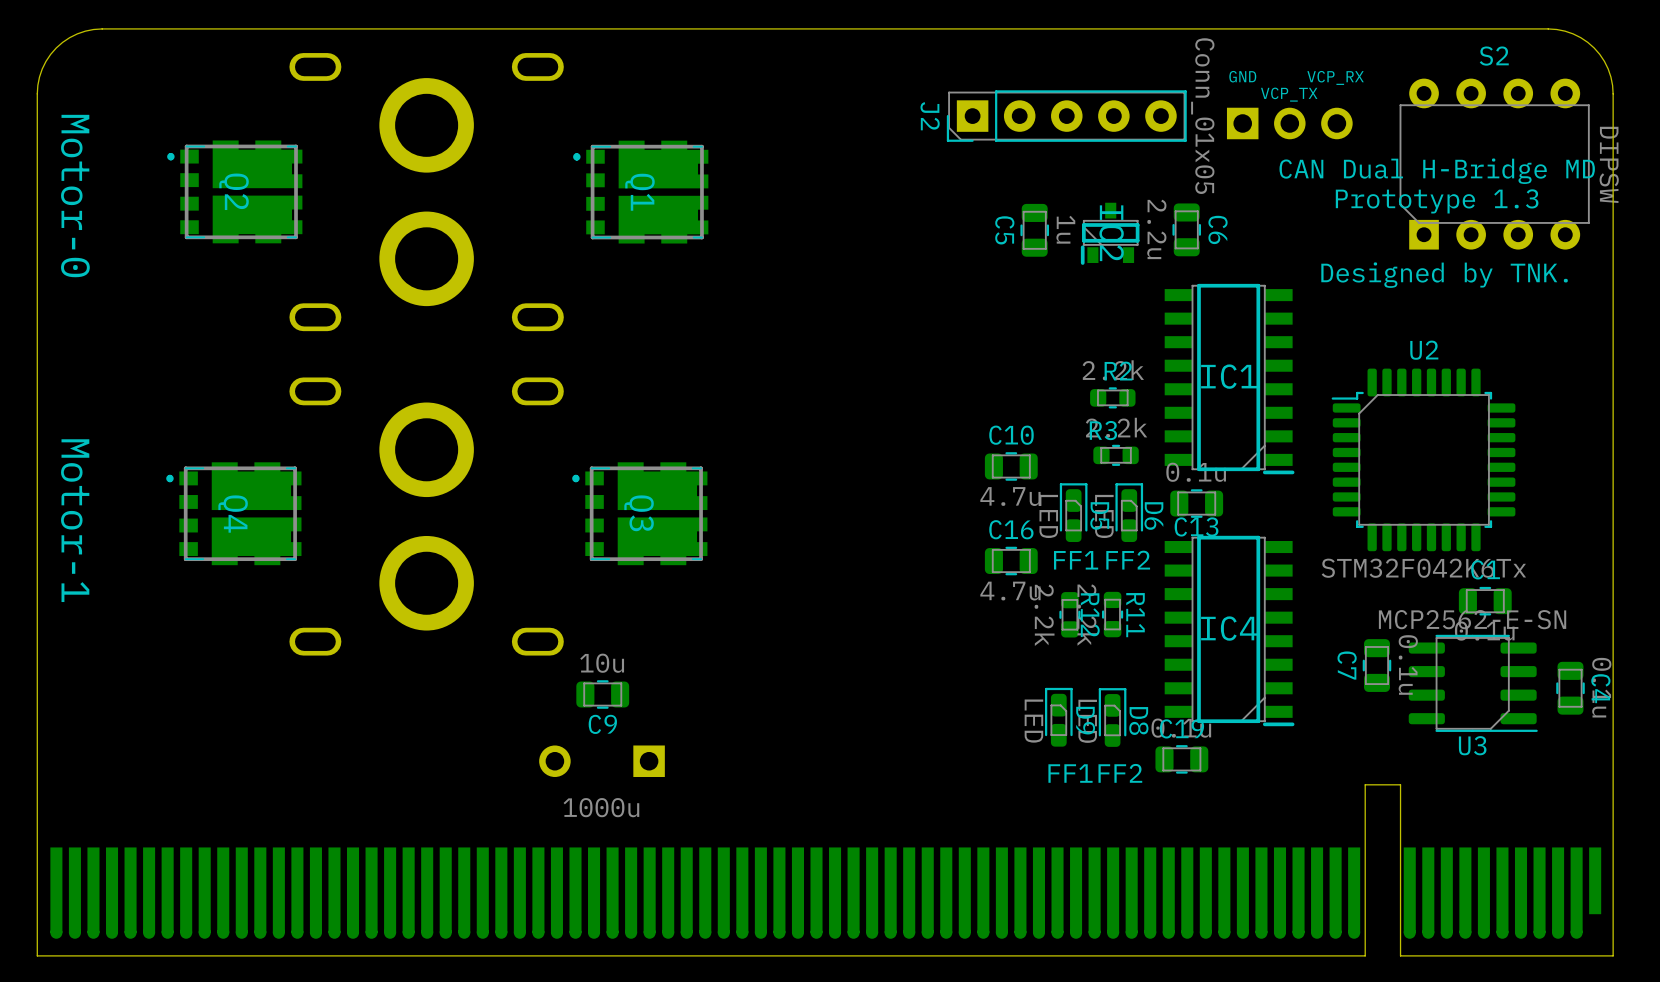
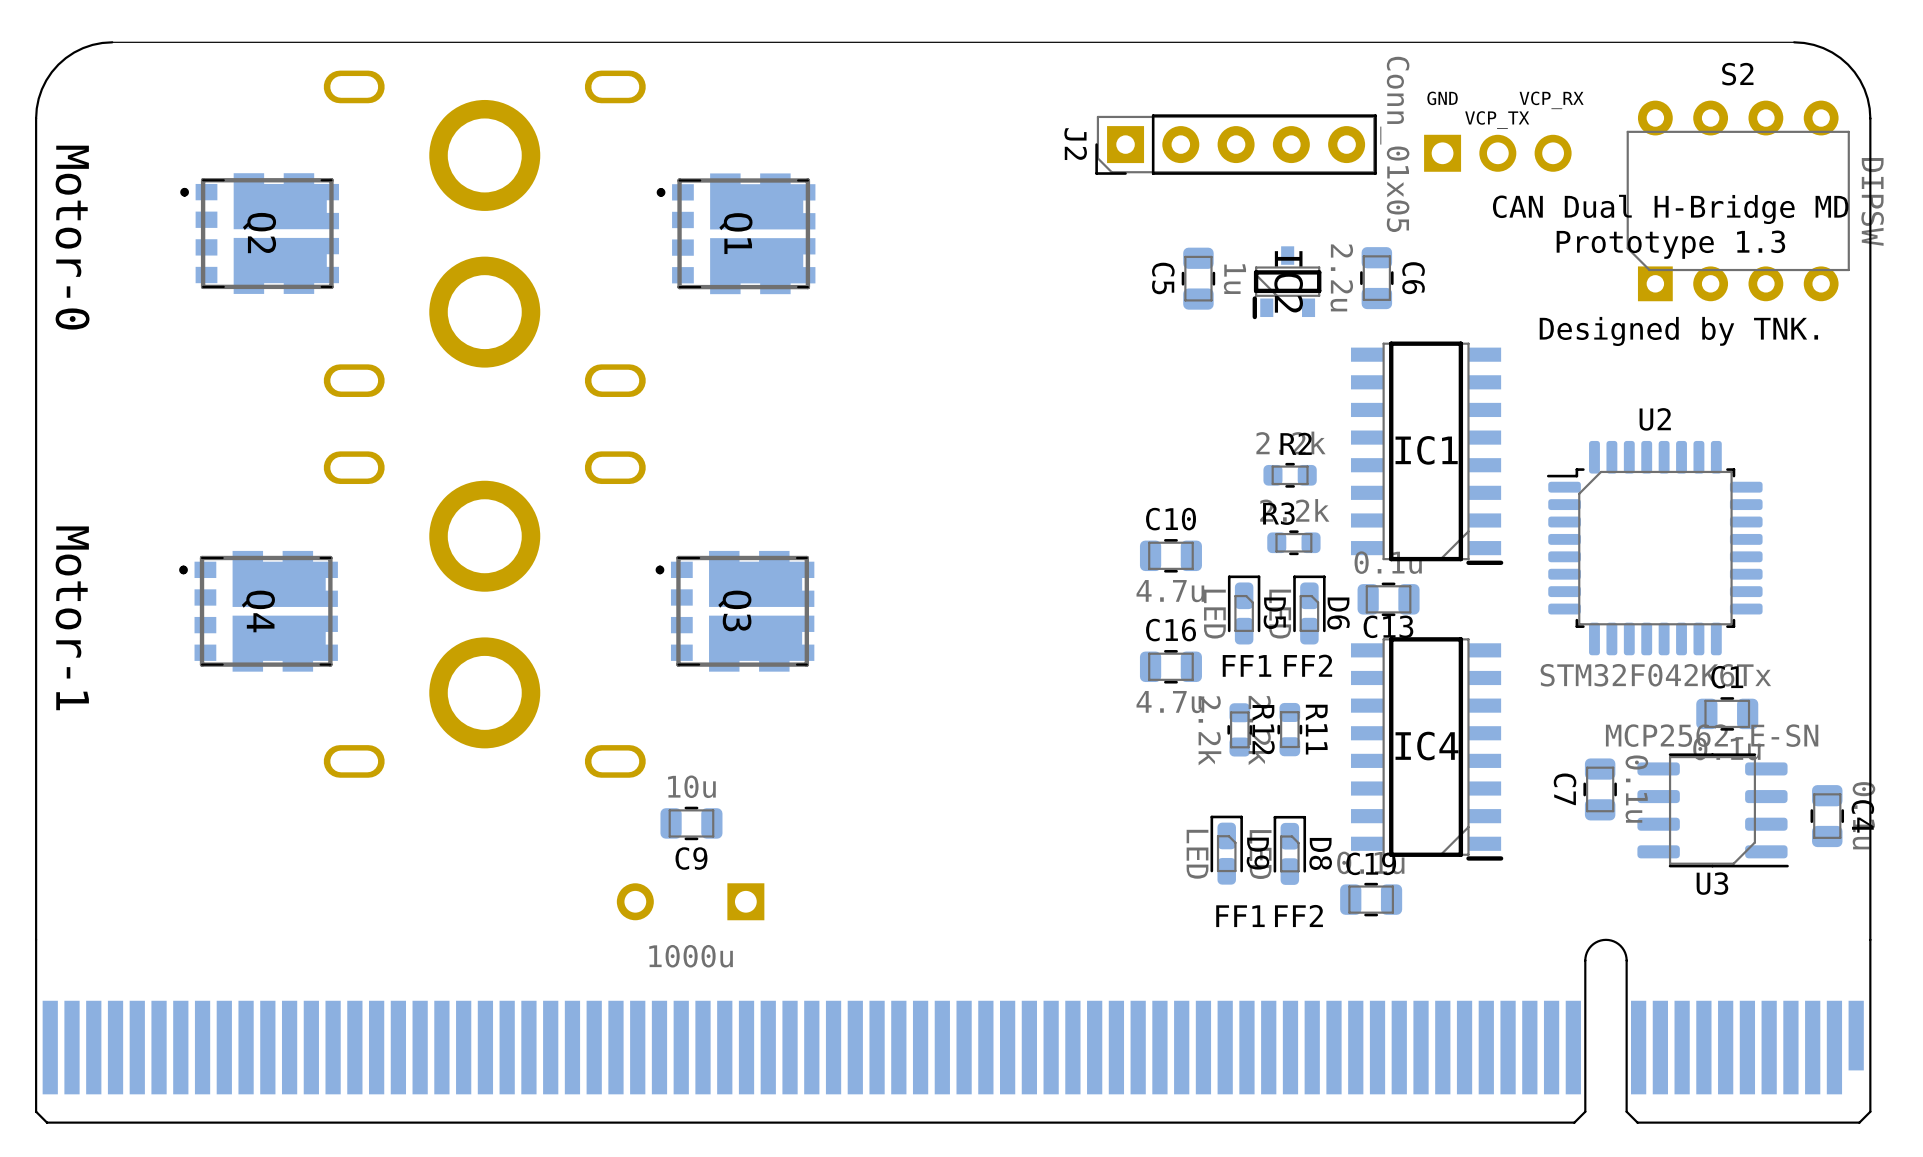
board edge: none -> (112, 42) (83, 48) (65, 58) (46, 80) (36, 108) (36, 939)
board edge: (1542, 28) (1565, 31) (1587, 42) (1604, 61) (1612, 85) (1613, 955) (1400, 955) (1400, 784) (1365, 784) (1365, 955) (37, 955) (37, 85) (45, 61) (62, 42) (85, 31) (109, 28) -> (1794, 42) (1823, 48) (1840, 58) (1860, 80) (1869, 108) (1870, 939)
part: none -> (953, 1031)
part: (825, 893) -> none

